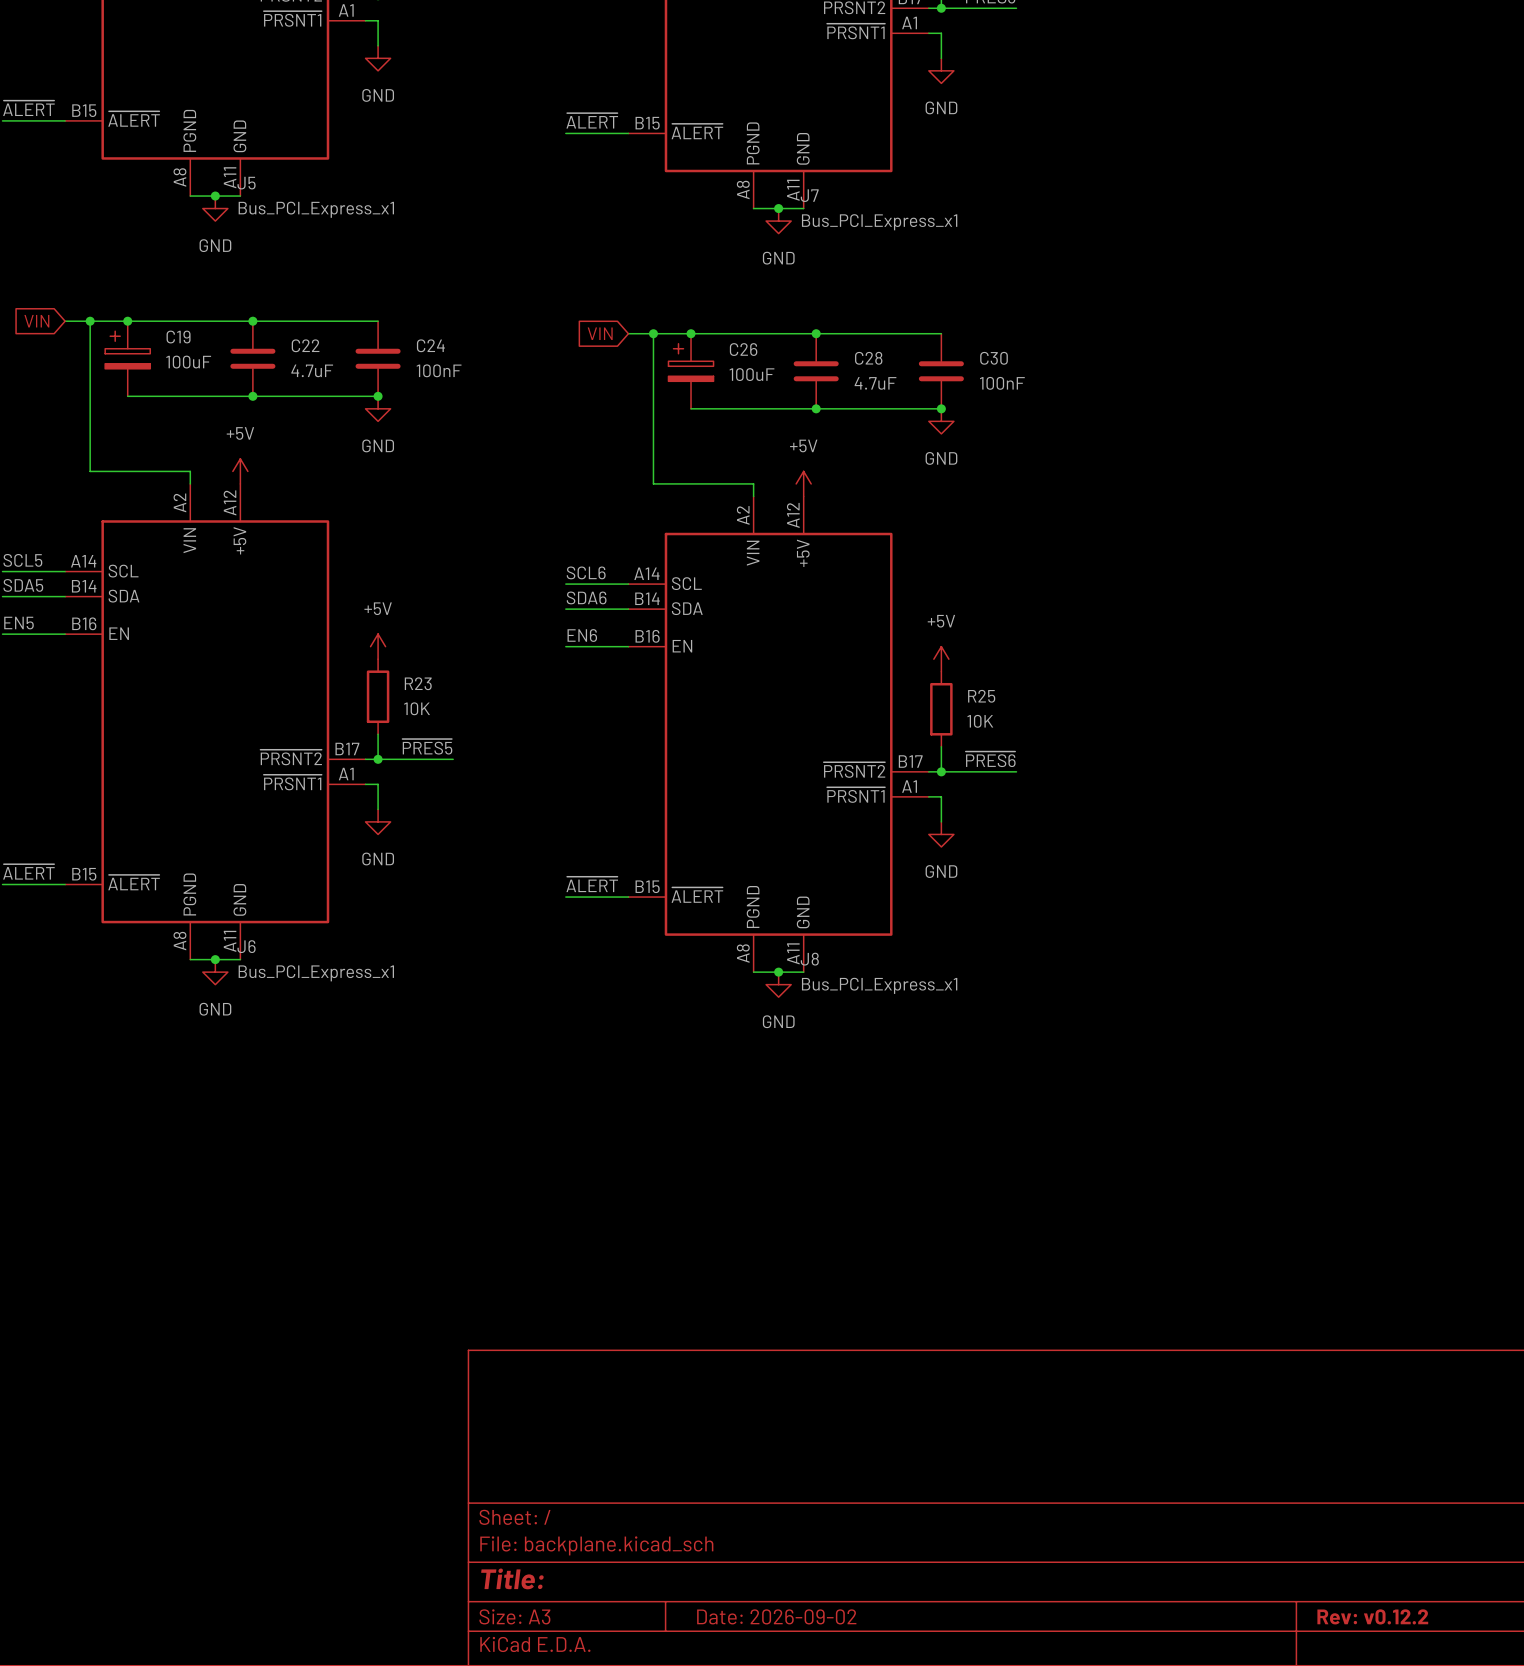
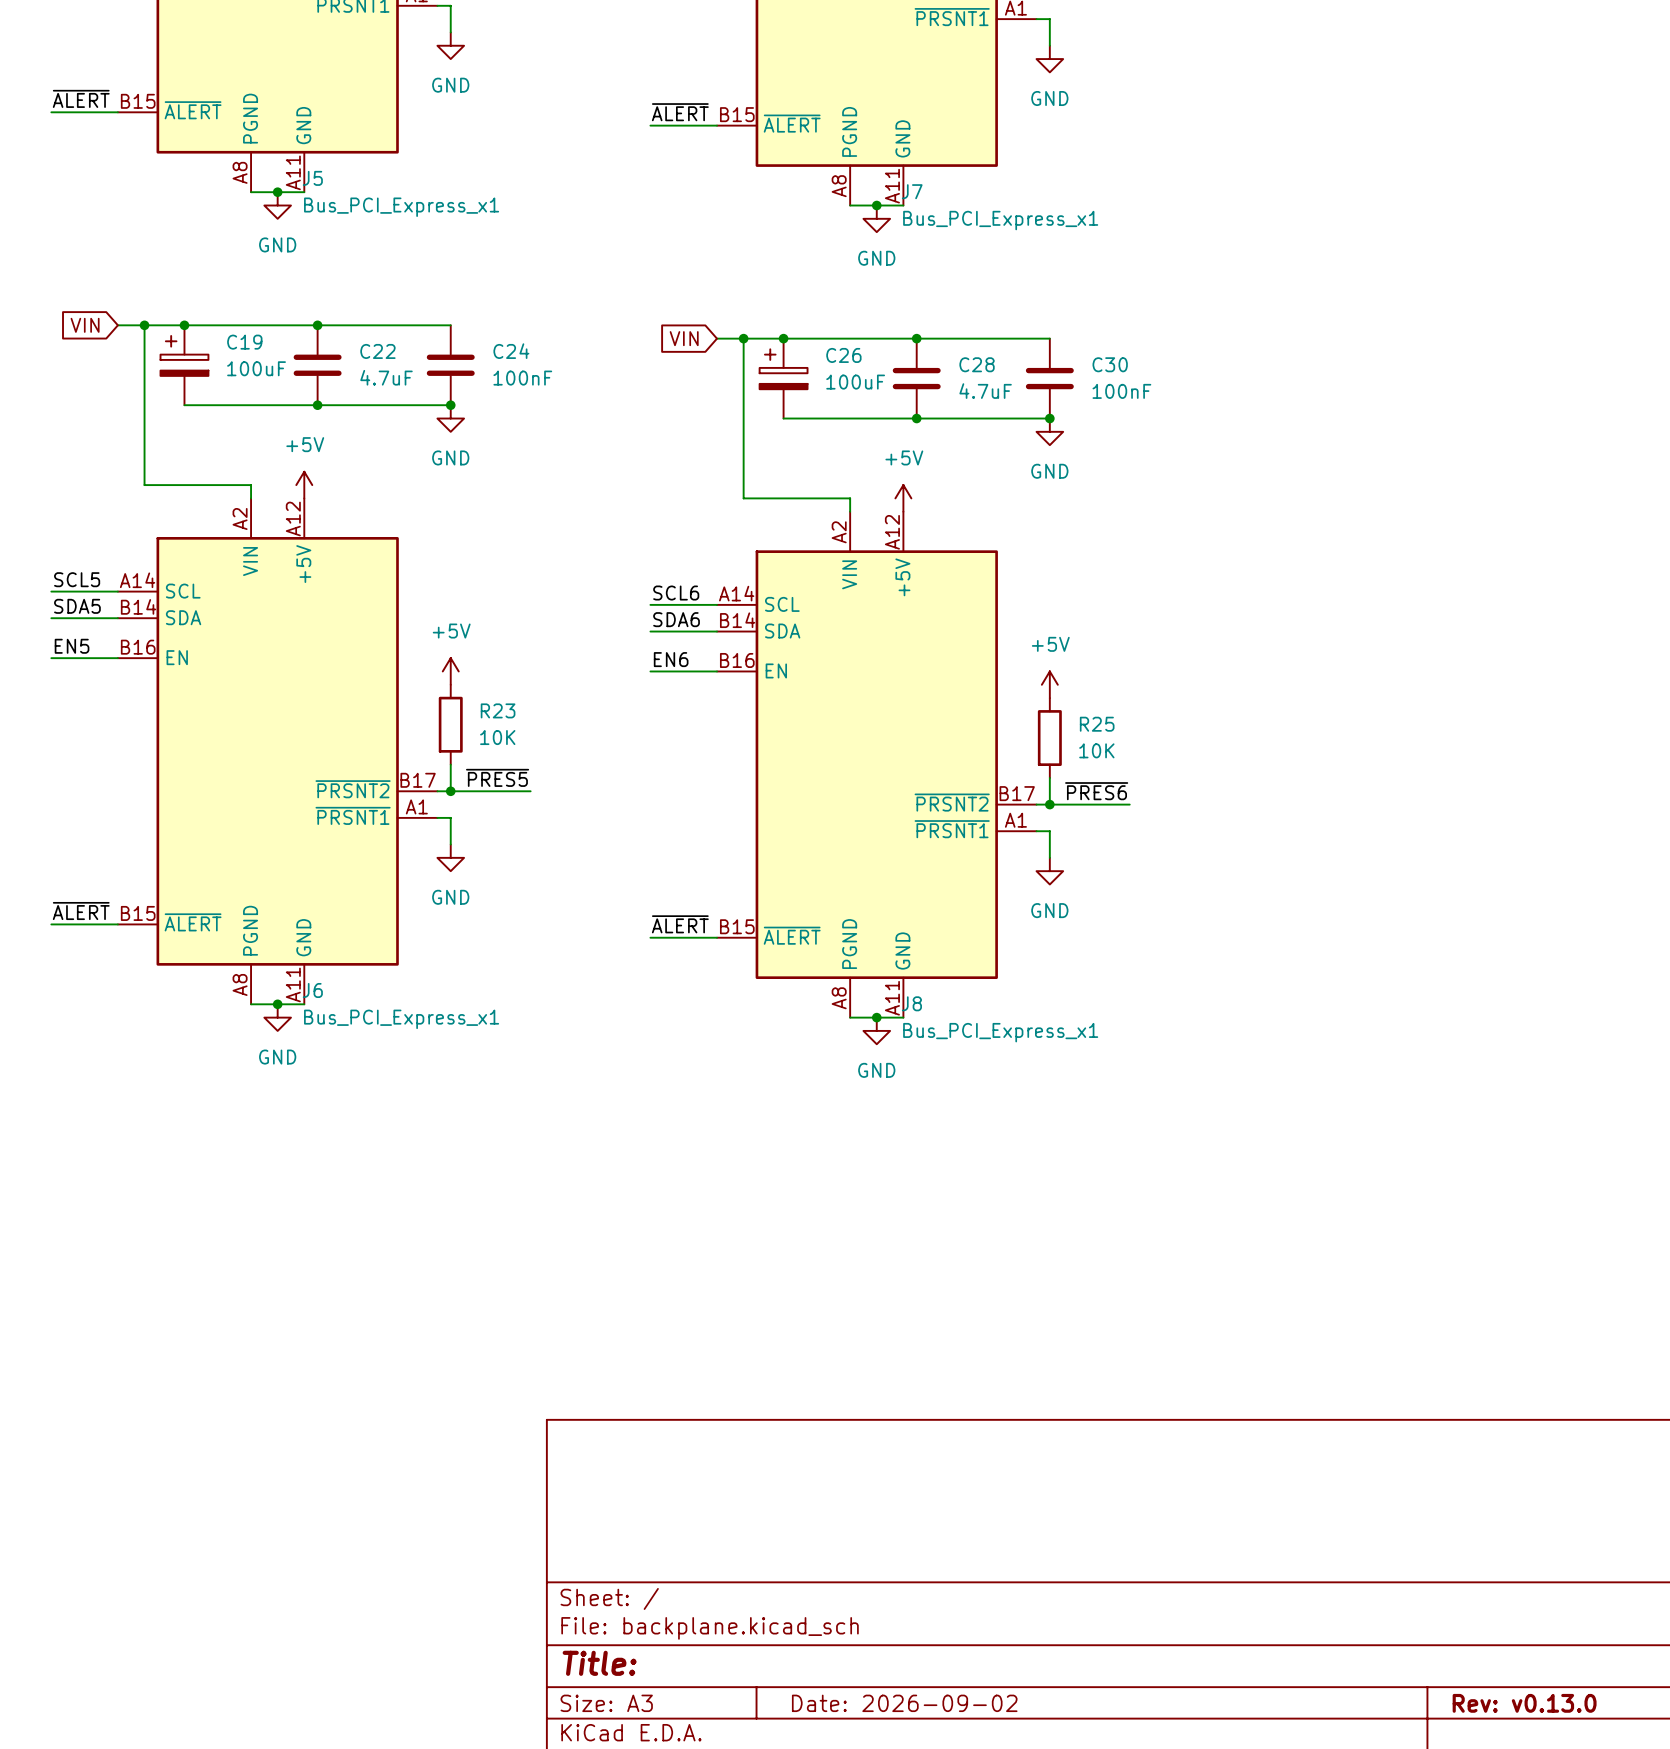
title block: Rev: v0.12.2 (1372, 1616) -> Rev: v0.13.0 (1524, 1703)

